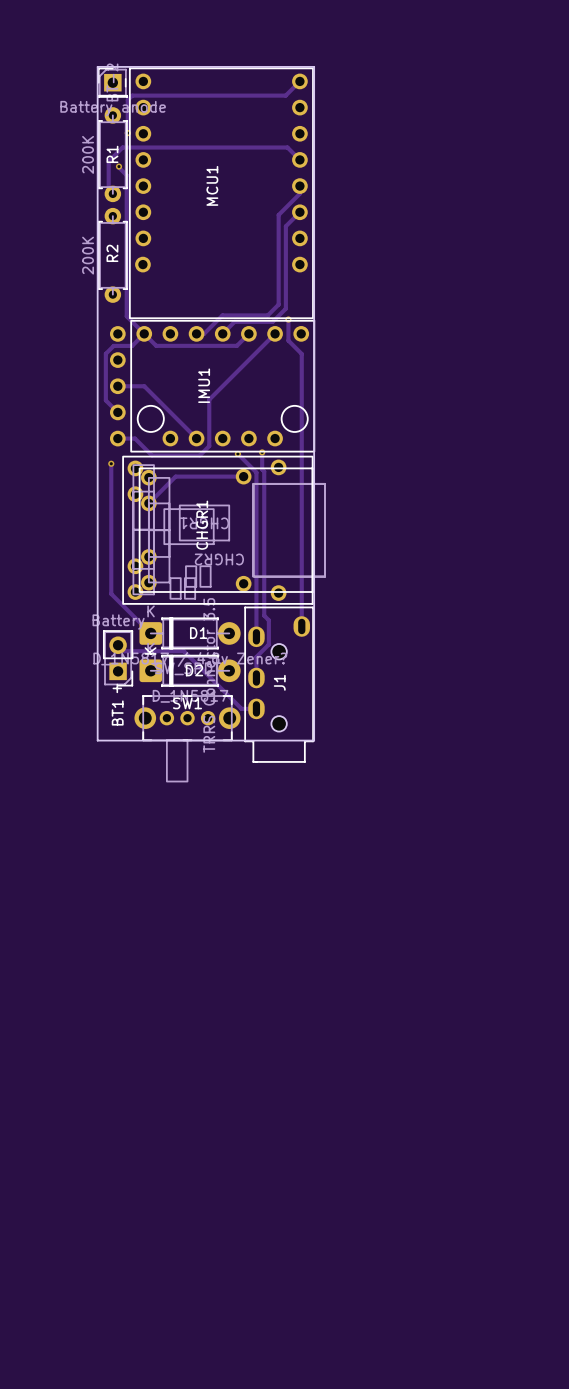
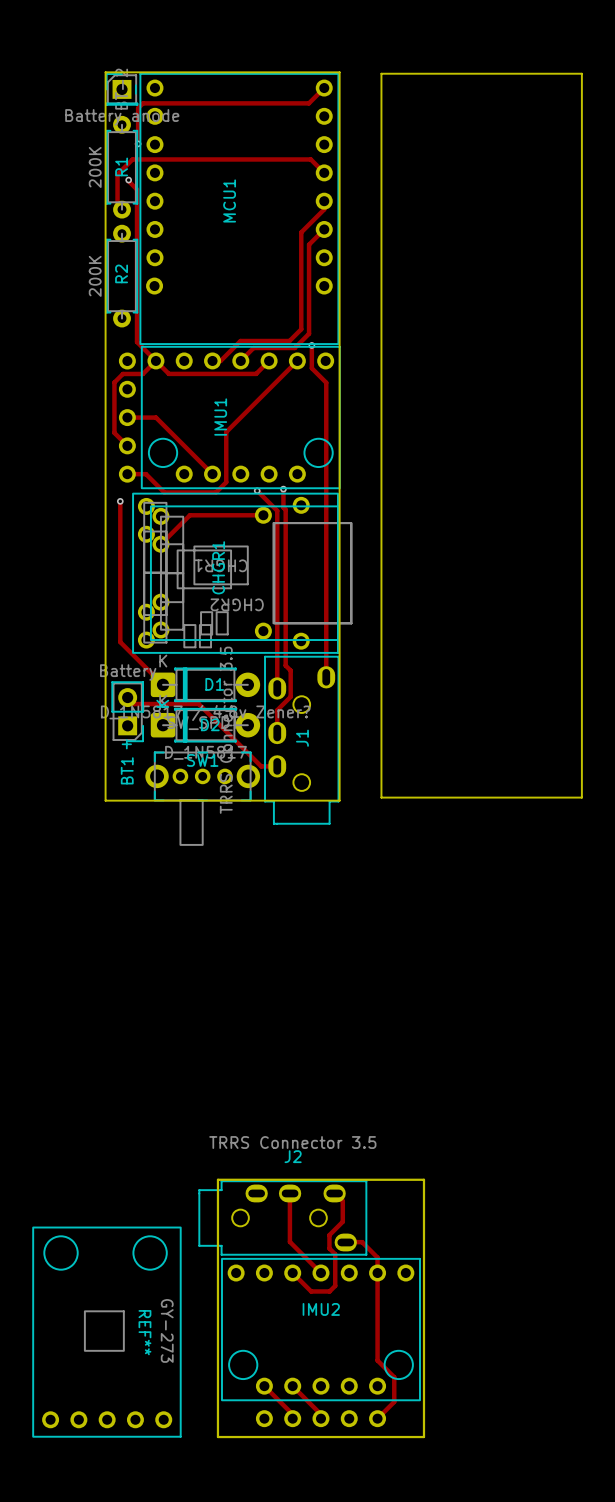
board edge: none -> (381, 73) (581, 73) (581, 797) (381, 797) (381, 73)
board edge: none -> (217, 1179) (423, 1179) (423, 1437) (217, 1437) (217, 1179)
track: none -> (334, 1193) (342, 1201) (342, 1221) (329, 1235) (329, 1248) (335, 1254) (335, 1285) (329, 1291) (311, 1291) (292, 1272)
track: none -> (289, 1193) (289, 1241) (320, 1272)
J2: none -> TRRS Connector 3.5 (282, 1217)
track: none -> (345, 1242) (362, 1242) (377, 1257) (377, 1360) (394, 1377) (394, 1401) (377, 1418)
IMU2: none -> (320, 1329)
REF**: none -> GY-273 (106, 1332)
track: none -> (264, 1386) (292, 1414) (292, 1418)
track: none -> (292, 1386) (320, 1414) (320, 1418)
part: none -> (320, 1418)

